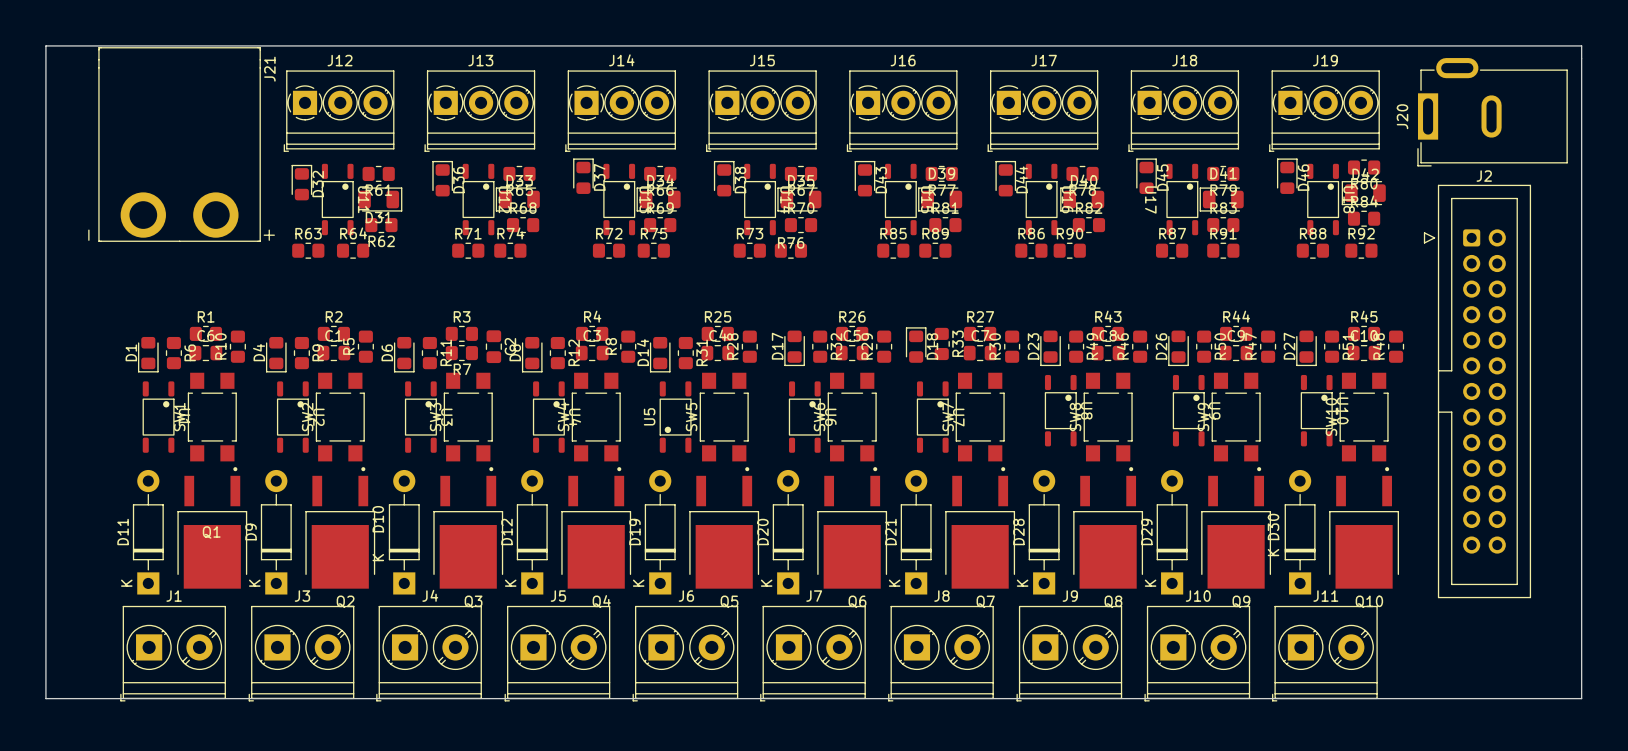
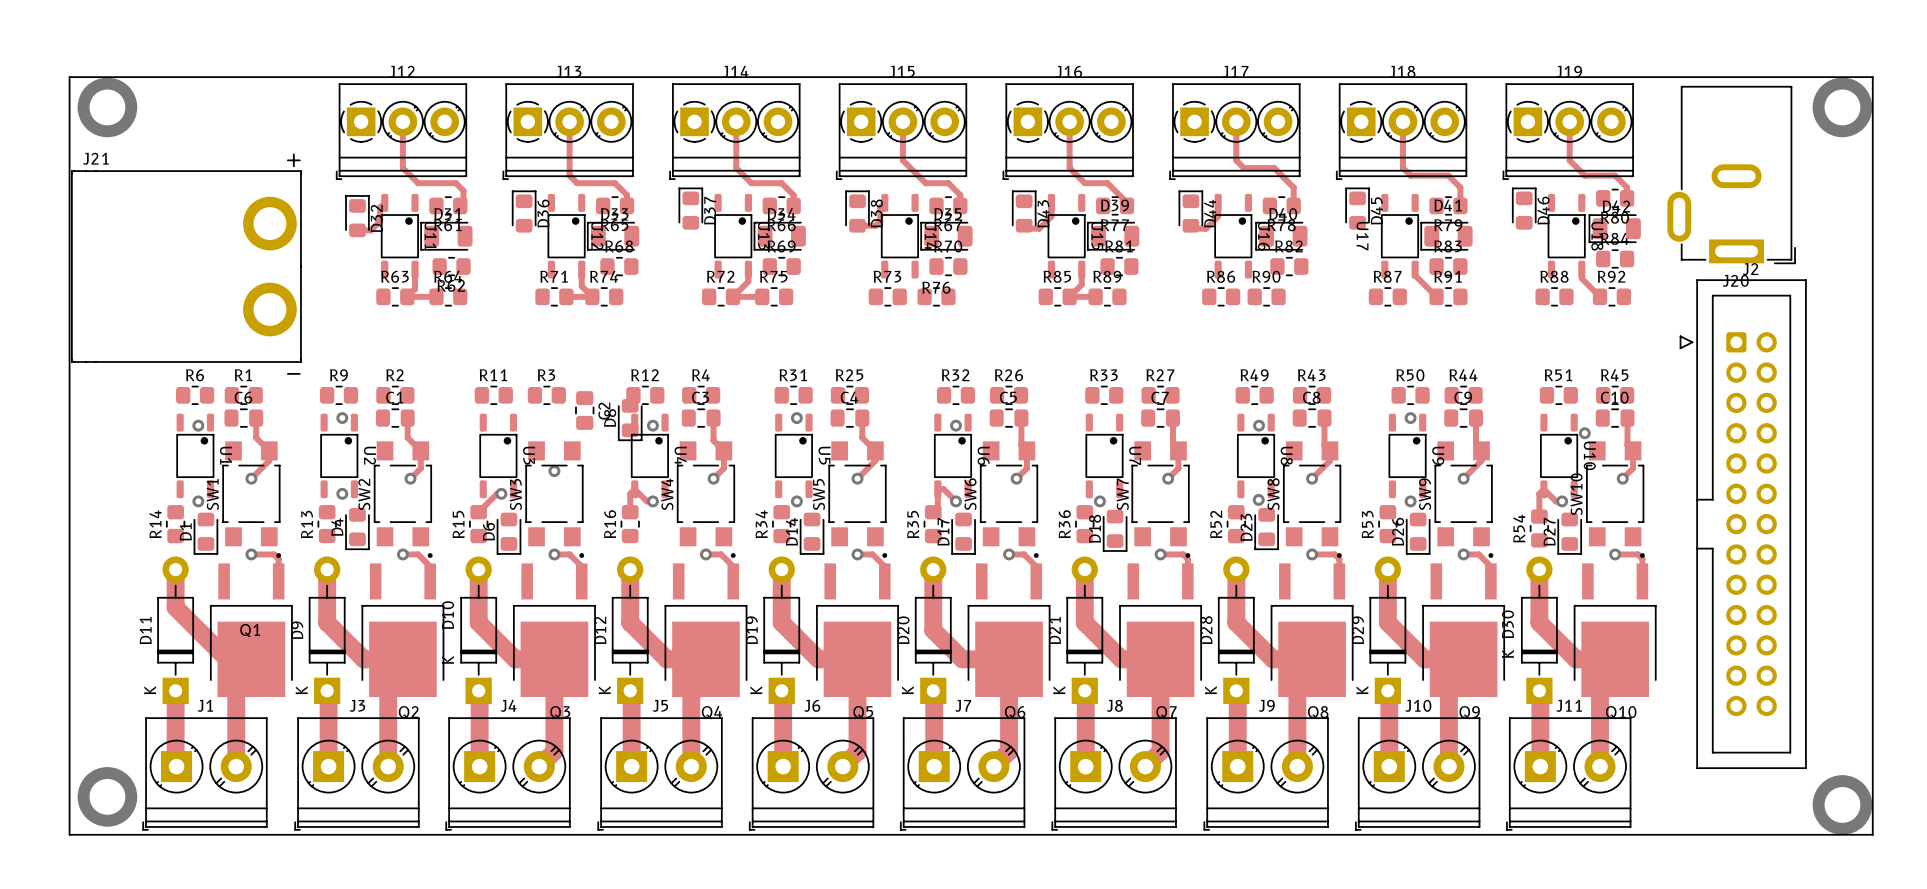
board edge: (1581, 65) (1581, 45) (45, 45) (45, 698) (1581, 698) -> (1872, 77) (69, 77) (69, 834) (1872, 834) (1872, 827)
via: none -> (107, 107)
via: none -> (1842, 107)
track: none -> (402, 121) (402, 168) (418, 183) (455, 183) (463, 190) (463, 202) (460, 205)
track: none -> (569, 121) (569, 175) (577, 183) (615, 183) (626, 195) (626, 205)
track: none -> (736, 121) (736, 168) (751, 183) (781, 183) (793, 195) (793, 205)
track: none -> (902, 121) (902, 160) (925, 183) (948, 183) (960, 195) (960, 205)
track: none -> (1069, 121) (1069, 168) (1084, 183) (1107, 183) (1127, 202) (1127, 205)
track: none -> (1236, 121) (1236, 160) (1243, 168) (1274, 168) (1293, 187) (1293, 205)
track: none -> (1403, 121) (1403, 168) (1410, 175) (1448, 175) (1460, 187) (1460, 205)
track: none -> (1569, 121) (1569, 160) (1584, 175) (1615, 175) (1627, 187) (1627, 198)
J20 rotation: 0° (1492, 112) -> 90° counterclockwise (1731, 175)
J21 rotation: 0° (181, 144) -> 90° counterclockwise (186, 264)
track: none -> (384, 202) (380, 207) (380, 221) (370, 230) (357, 230)
track: none -> (884, 202) (880, 207) (880, 221) (875, 225) (857, 225)
track: none -> (1051, 202) (1051, 216) (1039, 228) (1027, 228) (1024, 225)
track: none -> (1218, 202) (1218, 216) (1206, 228) (1193, 228) (1190, 225)
D31 rotation: 0° (380, 199) -> 180° (446, 236)
track: none -> (415, 269) (415, 289) (407, 296) (436, 296)
track: none -> (581, 269) (581, 286) (592, 296) (566, 296)
track: none -> (748, 269) (748, 281) (733, 296) (762, 296)
track: none -> (1081, 269) (1081, 284) (1069, 296) (1095, 296)
track: none -> (1415, 275) (1436, 296)
track: none -> (1581, 278) (1600, 296)
R63 position: (308, 250) -> (395, 296)
R64 position: (353, 250) -> (448, 296)
R33 rotation: 0° (941, 343) -> 90° clockwise (1104, 395)
R33 name position: R33 (958, 343) -> R33 (1103, 375)
D18 rotation: 0° (916, 345) -> 180° (1115, 530)
D18 position: (916, 345) -> (1115, 530)
R10: (237, 346) -> none
R5: (365, 346) -> none
R8: (628, 346) -> none
R28: (749, 346) -> none
R32 rotation: 0° (820, 346) -> 90° clockwise (956, 395)
R32 name position: R32 (836, 346) -> R32 (955, 375)
R29: (884, 346) -> none
R30: (1012, 346) -> none
R49 rotation: 0° (1076, 346) -> 90° clockwise (1254, 395)
R49 position: (1076, 346) -> (1254, 395)
R49 name position: R49 (1092, 346) -> R49 (1254, 375)
R46: (1140, 346) -> none
R50 rotation: 0° (1204, 346) -> 90° clockwise (1410, 395)
R50 name position: R50 (1220, 346) -> R50 (1410, 375)
R47: (1268, 346) -> none
R51 rotation: 0° (1332, 346) -> 90° clockwise (1558, 395)
R51 position: (1332, 346) -> (1558, 395)
R51 name position: R51 (1348, 346) -> R51 (1558, 375)
R48: (1396, 346) -> none
D17 position: (794, 348) -> (963, 533)
D23 position: (1050, 348) -> (1266, 528)
D26 position: (1178, 348) -> (1418, 533)
D27 position: (1306, 348) -> (1569, 533)
R6 name position: R6 (190, 352) -> R6 (195, 375)
R9 name position: R9 (318, 352) -> R9 (338, 375)
R11 name position: R11 (446, 352) -> R11 (493, 375)
R12 name position: R12 (574, 352) -> R12 (645, 375)
R31 name position: R31 (702, 352) -> R31 (793, 375)
R6 rotation: 0° (173, 353) -> 90° clockwise (195, 395)
R6 position: (173, 353) -> (195, 395)
track: none -> (256, 418) (256, 437) (269, 450) (269, 460) (251, 478)
via: none -> (342, 418)
R9 rotation: 0° (301, 353) -> 90° clockwise (339, 395)
R9 position: (301, 353) -> (339, 395)
track: none -> (407, 418) (407, 437) (420, 450) (420, 468) (410, 478)
R11 rotation: 0° (429, 353) -> 90° clockwise (493, 395)
R11 position: (429, 353) -> (493, 395)
R7: (461, 353) -> none
R12 rotation: 0° (557, 353) -> 90° clockwise (645, 395)
R12 position: (557, 353) -> (645, 395)
track: none -> (713, 418) (713, 440) (723, 450) (723, 468) (713, 478)
via: none -> (796, 418)
R31 rotation: 0° (685, 353) -> 90° clockwise (793, 395)
R31 position: (685, 353) -> (793, 395)
track: none -> (862, 418) (862, 437) (875, 450) (875, 460) (857, 478)
track: none -> (1021, 418) (1021, 445) (1026, 450) (1026, 468) (1016, 478)
track: none -> (1172, 418) (1172, 445) (1178, 450) (1178, 468) (1168, 478)
track: none -> (1324, 418) (1324, 445) (1329, 450) (1329, 460) (1312, 478)
via: none -> (1410, 418)
track: none -> (1476, 418) (1476, 445) (1481, 450) (1481, 460) (1463, 478)
track: none -> (1627, 418) (1627, 445) (1633, 450) (1633, 468) (1622, 478)
D1 position: (148, 354) -> (205, 533)
D4 position: (276, 354) -> (357, 528)
D6 position: (404, 354) -> (508, 533)
D14 position: (660, 354) -> (812, 533)
via: none -> (198, 425)
via: none -> (652, 425)
via: none -> (956, 425)
via: none -> (1259, 425)
via: none -> (1584, 433)
J2 position: (1477, 391) -> (1743, 524)
via: none -> (554, 471)
via: none -> (251, 478)
via: none -> (410, 478)
via: none -> (713, 478)
via: none -> (857, 478)
via: none -> (1016, 478)
via: none -> (1168, 478)
via: none -> (1312, 478)
via: none -> (1463, 478)
via: none -> (1622, 478)
U8 position: (1060, 410) -> (1256, 455)
U9 position: (1188, 410) -> (1407, 455)
U10 position: (1316, 410) -> (1559, 455)
U1 position: (158, 417) -> (195, 455)
via: none -> (342, 493)
U2 position: (292, 417) -> (339, 455)
U3 position: (420, 417) -> (498, 455)
track: none -> (501, 493) (497, 493) (478, 512)
via: none -> (501, 493)
U4 position: (548, 417) -> (649, 455)
U5 rotation: 0° (675, 417) -> 180° (793, 455)
U6 position: (804, 417) -> (952, 455)
U7 position: (932, 417) -> (1104, 455)
via: none -> (1258, 499)
via: none -> (198, 501)
track: none -> (652, 501) (646, 501) (634, 489) (630, 493) (630, 512)
via: none -> (652, 501)
via: none -> (796, 501)
track: none -> (956, 501) (943, 489) (937, 489) (937, 507) (933, 512)
via: none -> (956, 501)
via: none -> (1099, 501)
via: none -> (1410, 501)
track: none -> (1562, 501) (1556, 501) (1543, 489) (1539, 493) (1539, 516)
via: none -> (1562, 501)
R14: none -> (175, 524)
R13: none -> (327, 524)
R15: none -> (478, 524)
R16: none -> (630, 524)
R34: none -> (781, 524)
R35: none -> (933, 524)
R36: none -> (1084, 524)
R52: none -> (1236, 524)
R53: none -> (1387, 524)
R54: none -> (1539, 528)
track: none -> (251, 554) (274, 554) (278, 558) (278, 581)
via: none -> (251, 554)
track: none -> (402, 554) (418, 554) (430, 566) (430, 581)
via: none -> (402, 554)
track: none -> (554, 554) (569, 554) (581, 566) (581, 581)
via: none -> (554, 554)
track: none -> (705, 554) (721, 554) (733, 566) (733, 581)
via: none -> (705, 554)
track: none -> (857, 554) (872, 554) (884, 566) (884, 581)
via: none -> (857, 554)
track: none -> (1009, 554) (1024, 554) (1036, 566) (1036, 581)
via: none -> (1009, 554)
track: none -> (1160, 554) (1183, 554) (1187, 558) (1187, 581)
via: none -> (1160, 554)
track: none -> (1312, 554) (1334, 554) (1339, 558) (1339, 581)
via: none -> (1312, 554)
track: none -> (1463, 554) (1478, 554) (1490, 566) (1490, 581)
via: none -> (1463, 554)
track: none -> (1615, 554) (1637, 554) (1642, 558) (1642, 581)
via: none -> (1615, 554)
track: none -> (175, 569) (175, 607) (227, 659) (251, 659) (236, 674) (236, 766)
track: none -> (327, 569) (327, 622) (363, 659) (402, 659) (388, 674) (388, 766)
track: none -> (478, 569) (478, 622) (515, 659) (554, 659) (554, 751) (539, 766)
track: none -> (630, 569) (630, 622) (666, 659) (705, 659) (691, 674) (691, 766)
track: none -> (781, 569) (781, 622) (818, 659) (857, 659) (857, 751) (842, 766)
track: none -> (933, 569) (933, 630) (962, 659) (1009, 659) (1009, 751) (993, 766)
track: none -> (1084, 569) (1084, 622) (1121, 659) (1160, 659) (1160, 751) (1145, 766)
track: none -> (1236, 569) (1236, 622) (1273, 659) (1312, 659) (1297, 674) (1297, 766)
track: none -> (1387, 569) (1387, 622) (1424, 659) (1463, 659) (1448, 674) (1448, 766)
track: none -> (1539, 569) (1539, 622) (1576, 659) (1615, 659) (1600, 674) (1600, 766)
track: none -> (175, 690) (176, 766)
track: none -> (327, 690) (328, 766)
track: none -> (478, 690) (479, 766)
track: none -> (630, 690) (631, 766)
track: none -> (781, 690) (783, 766)
track: none -> (933, 690) (933, 765)
track: none -> (1084, 690) (1085, 766)
track: none -> (1236, 690) (1237, 766)
track: none -> (1387, 690) (1389, 766)
track: none -> (1539, 690) (1540, 766)
via: none -> (107, 796)
via: none -> (1842, 804)

